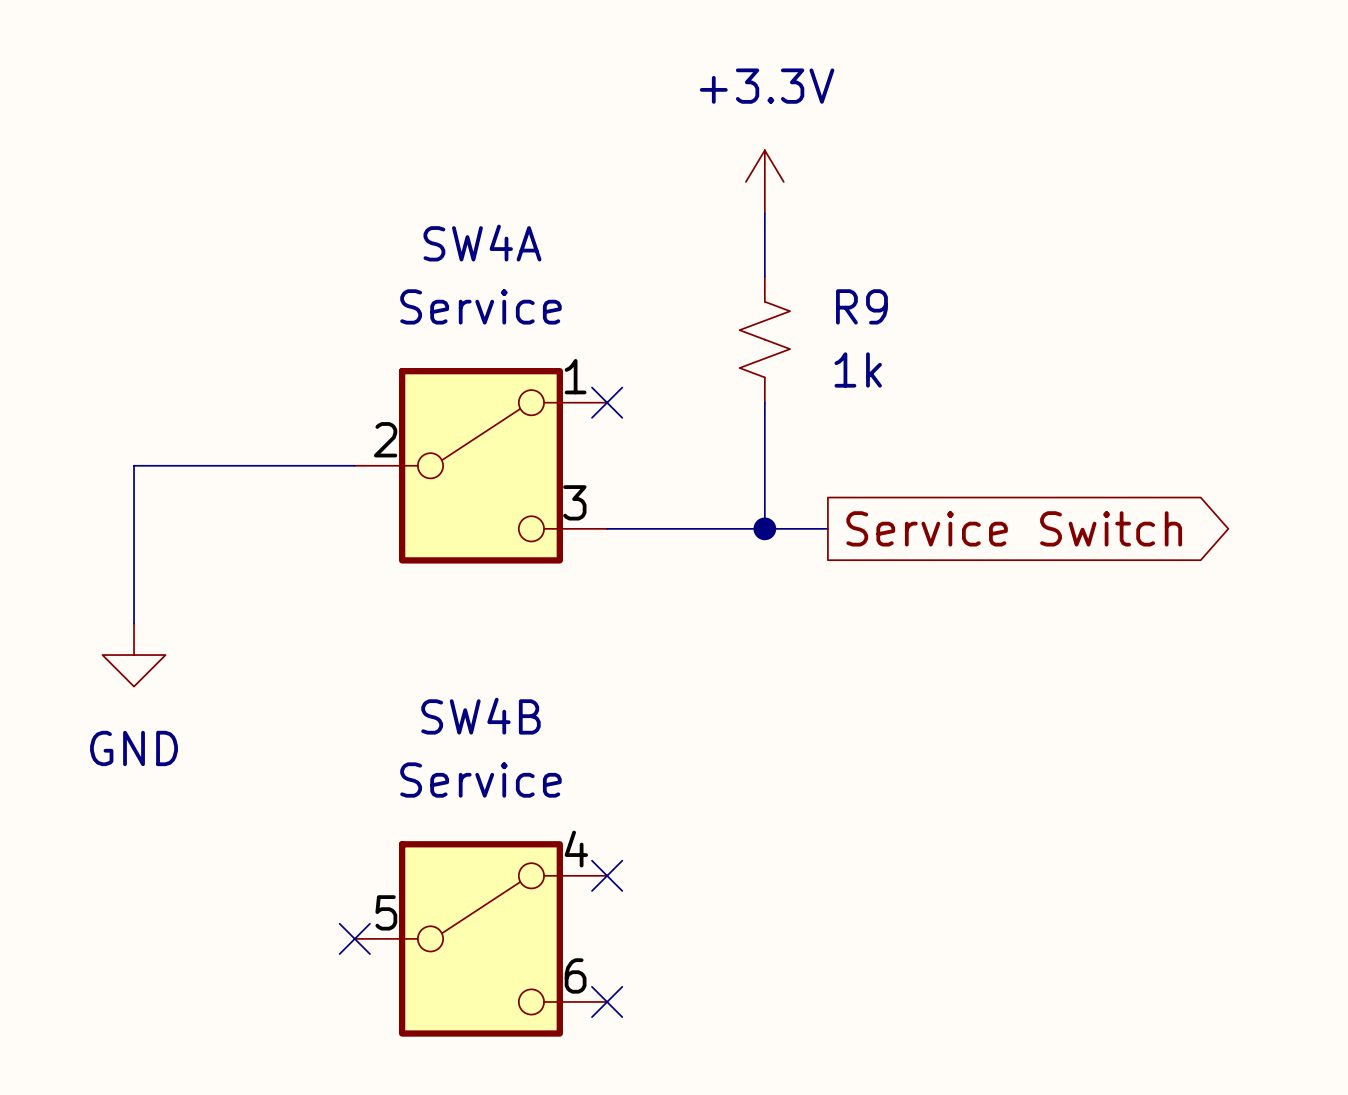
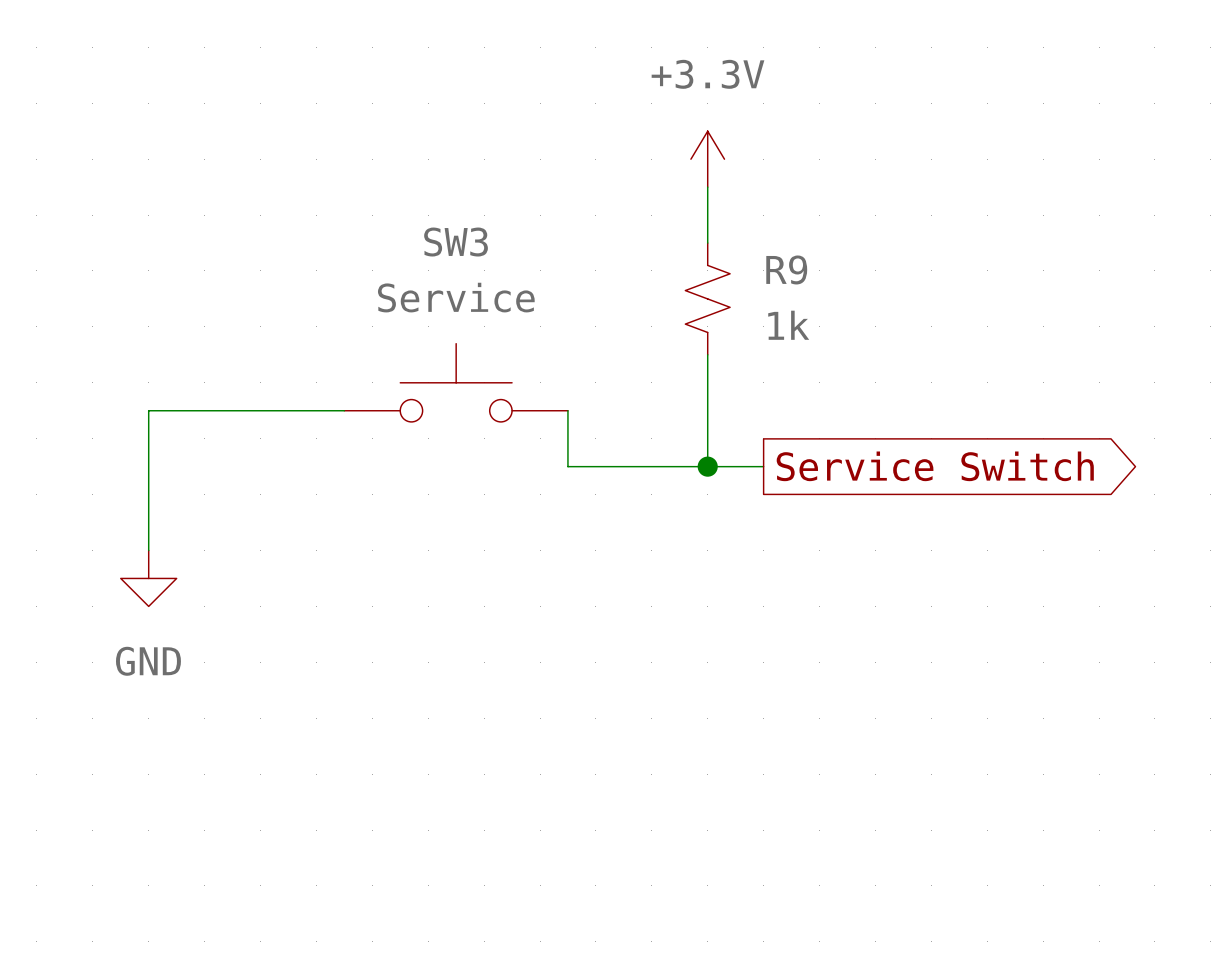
no-connect mark: (607, 402) -> none
SW3: none -> Service (456, 382)
SW4A: Service (480, 465) -> none
wire: none -> (567, 410) (567, 466)
no-connect mark: (607, 875) -> none
no-connect mark: (354, 938) -> none
SW4B: Service (480, 938) -> none
no-connect mark: (607, 1001) -> none

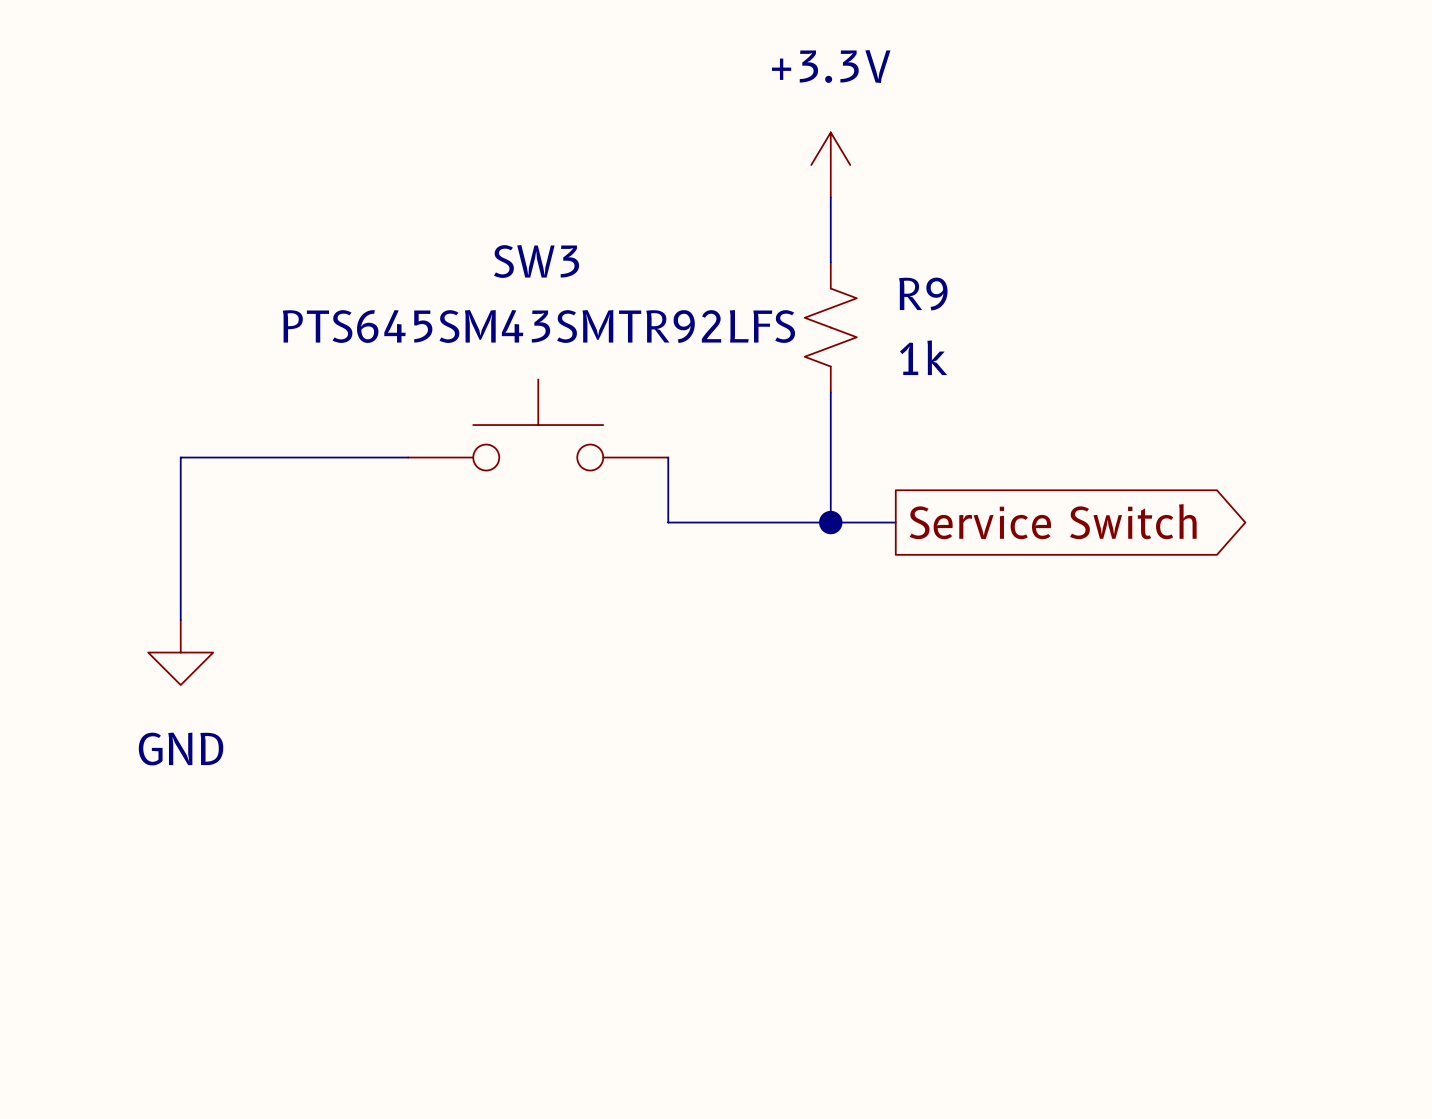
SW3 value: Service (456, 297) -> PTS645SM43SMTR92LFS (538, 326)

